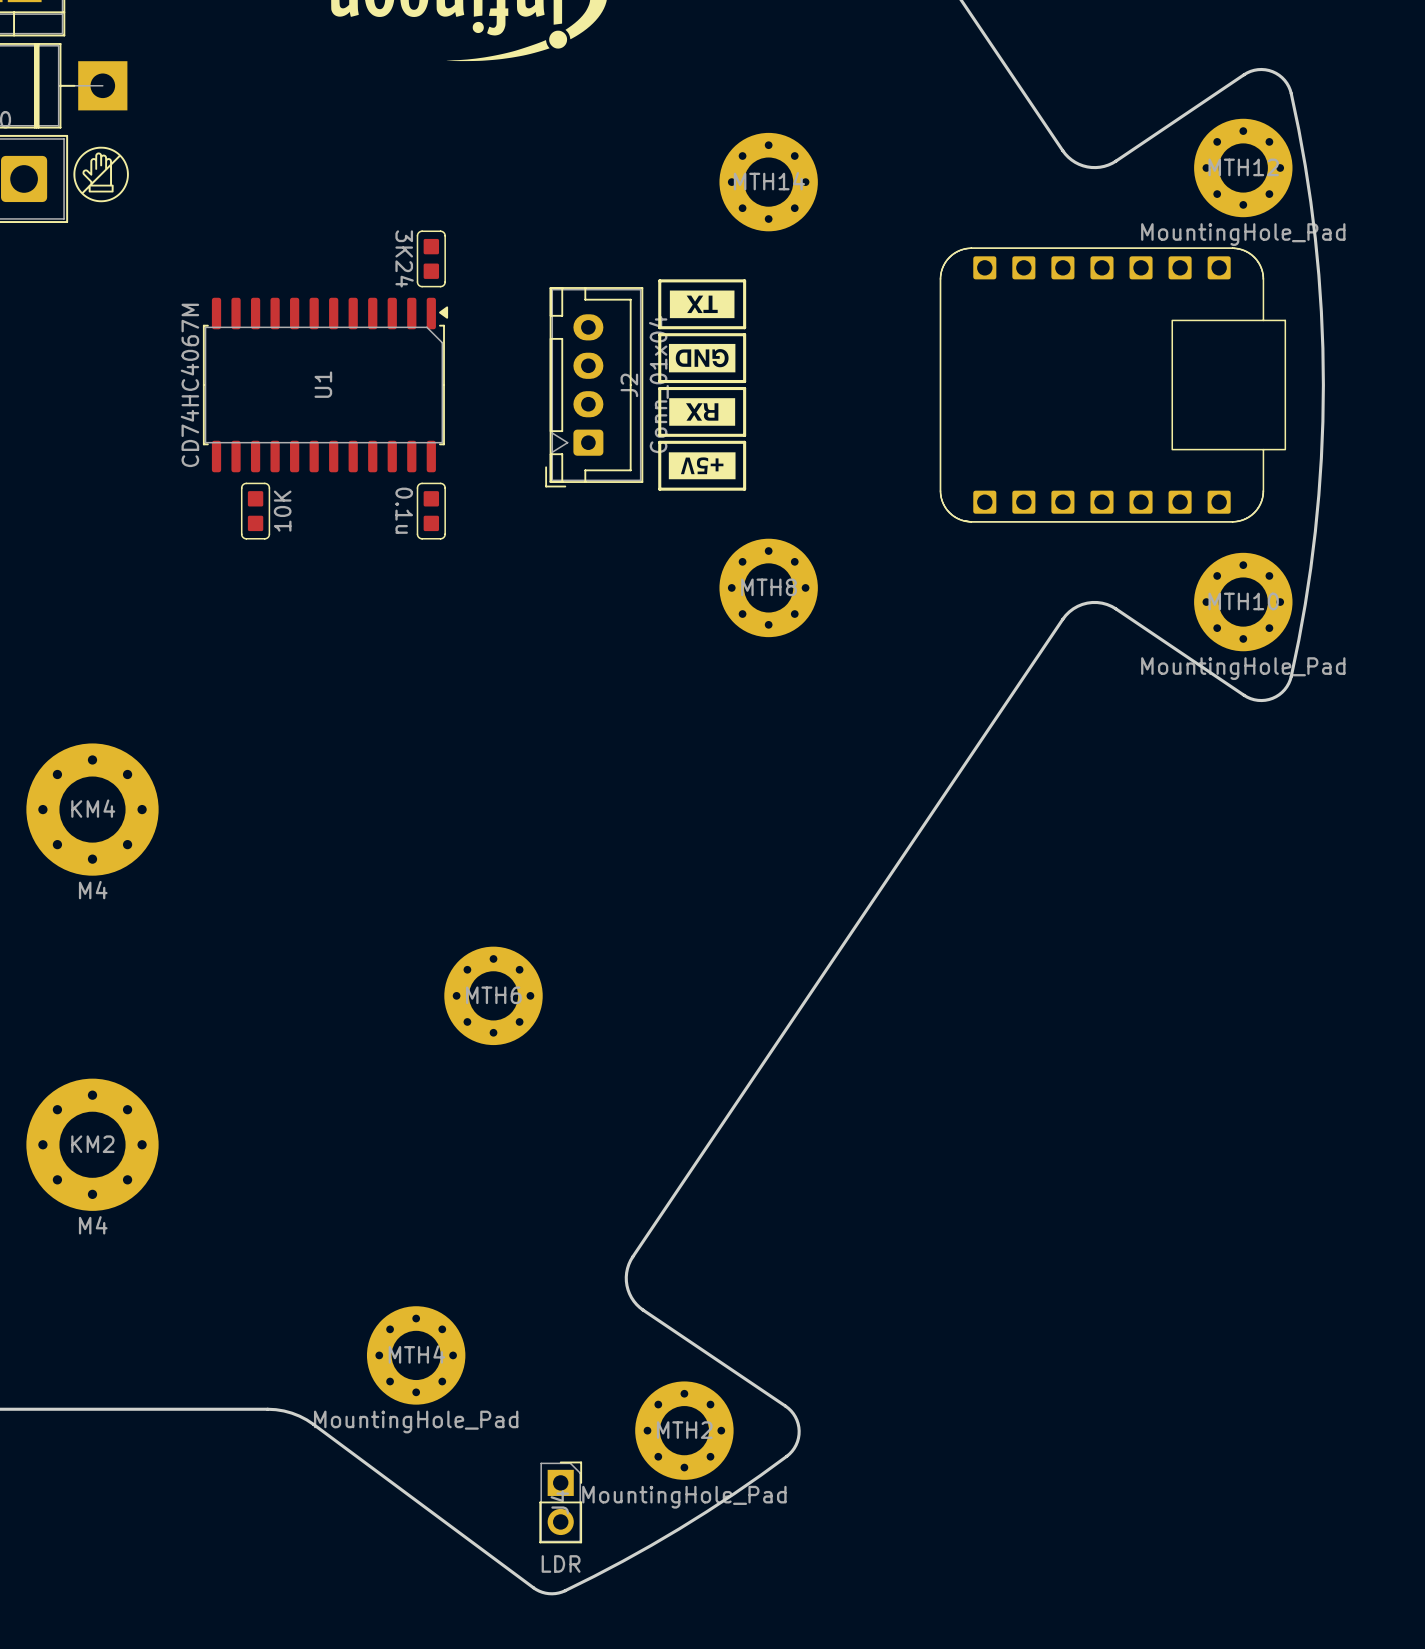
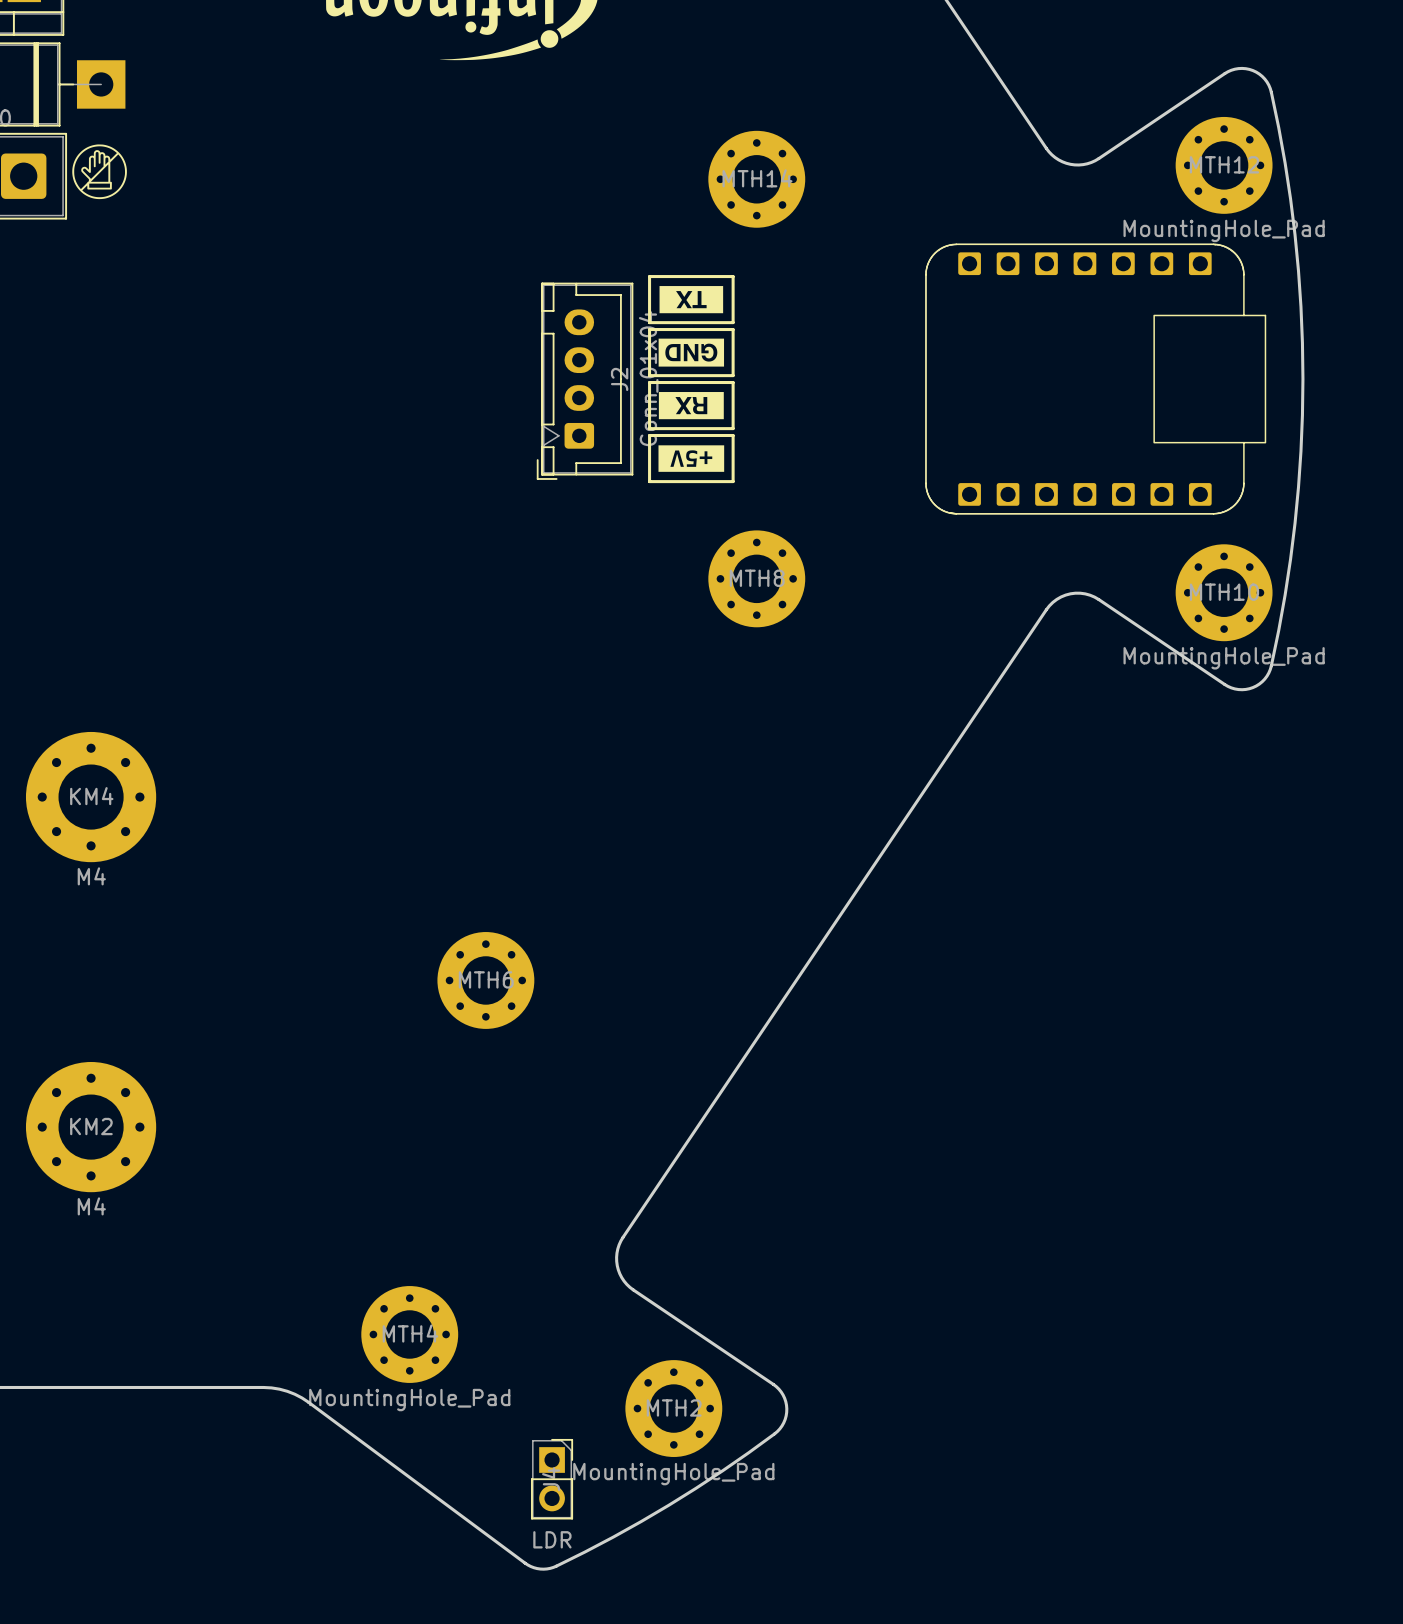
part: 3K24 (431, 258) -> none
U1: CD74HC4067M (325, 385) -> none
part: 10K (255, 511) -> none
part: 0.1u (431, 511) -> none

